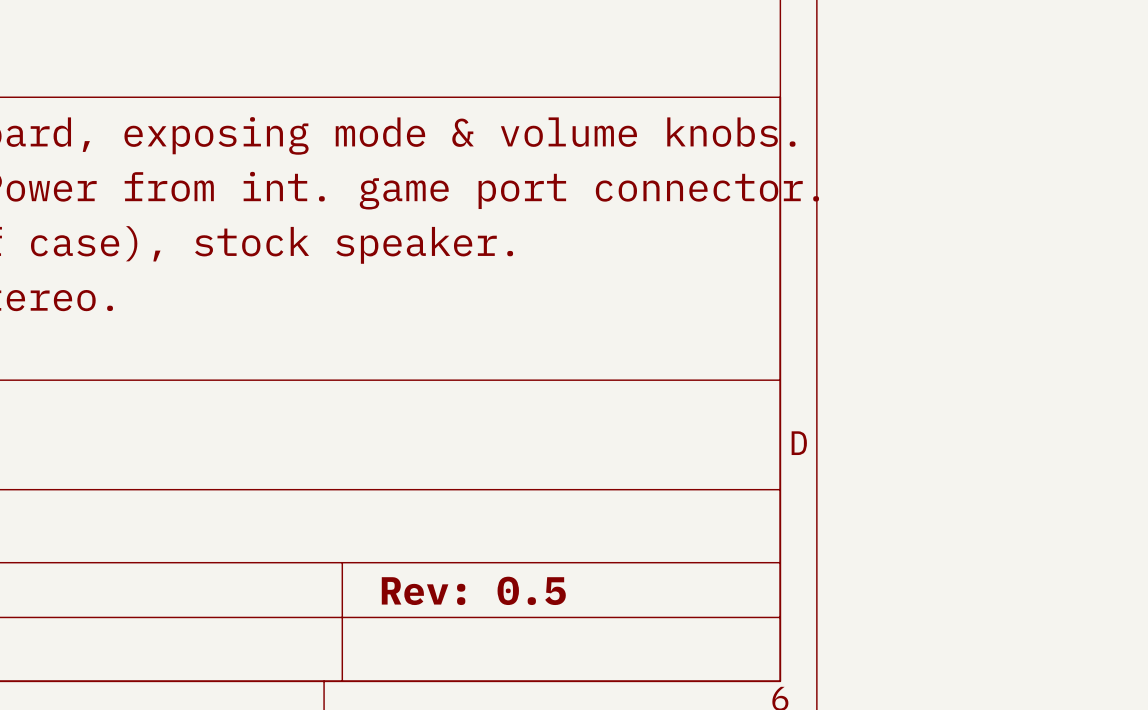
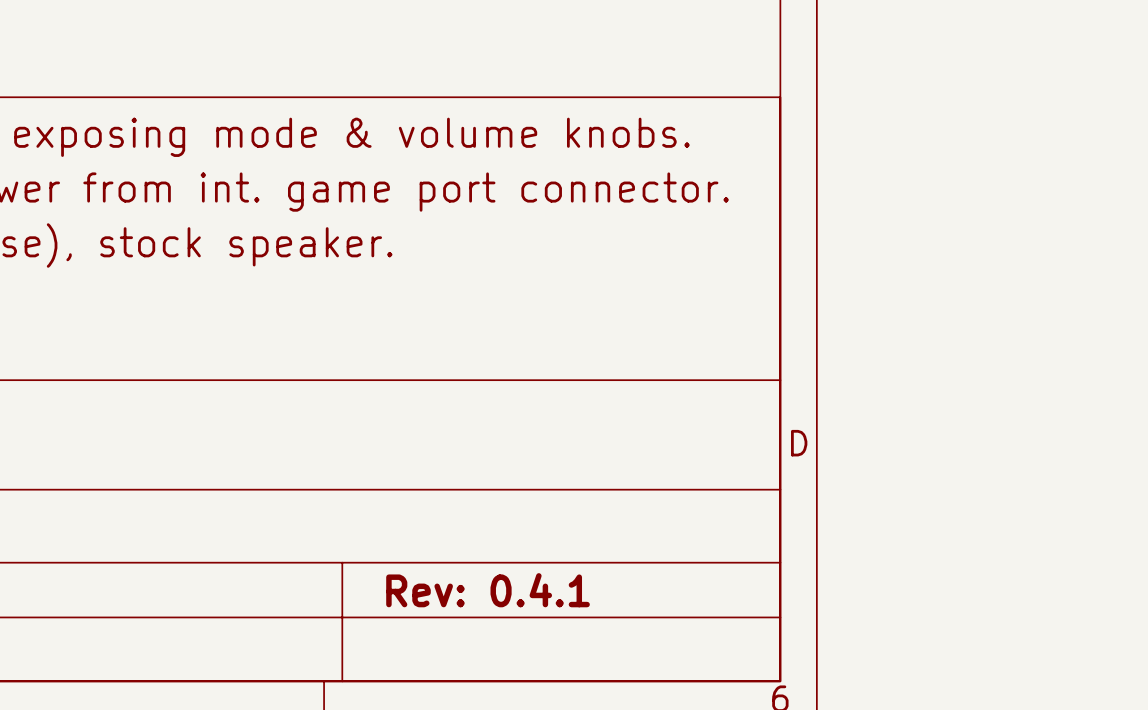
title block: Rev: 0.5 (473, 590) -> Rev: 0.4.1 (488, 590)

